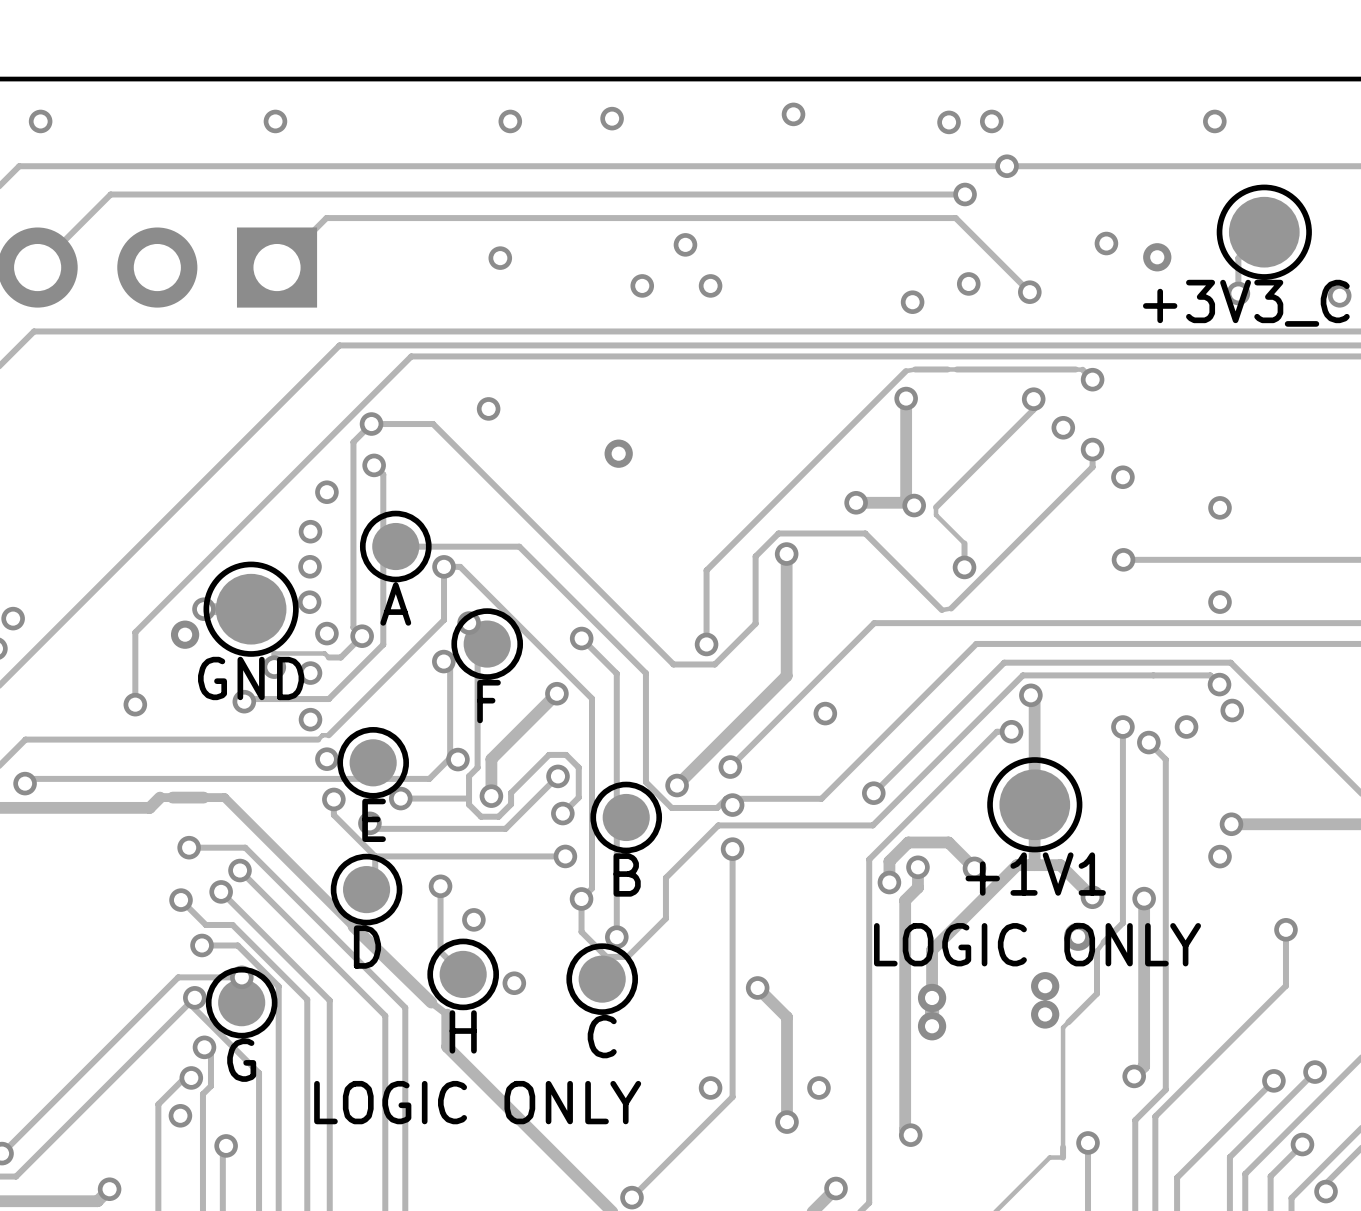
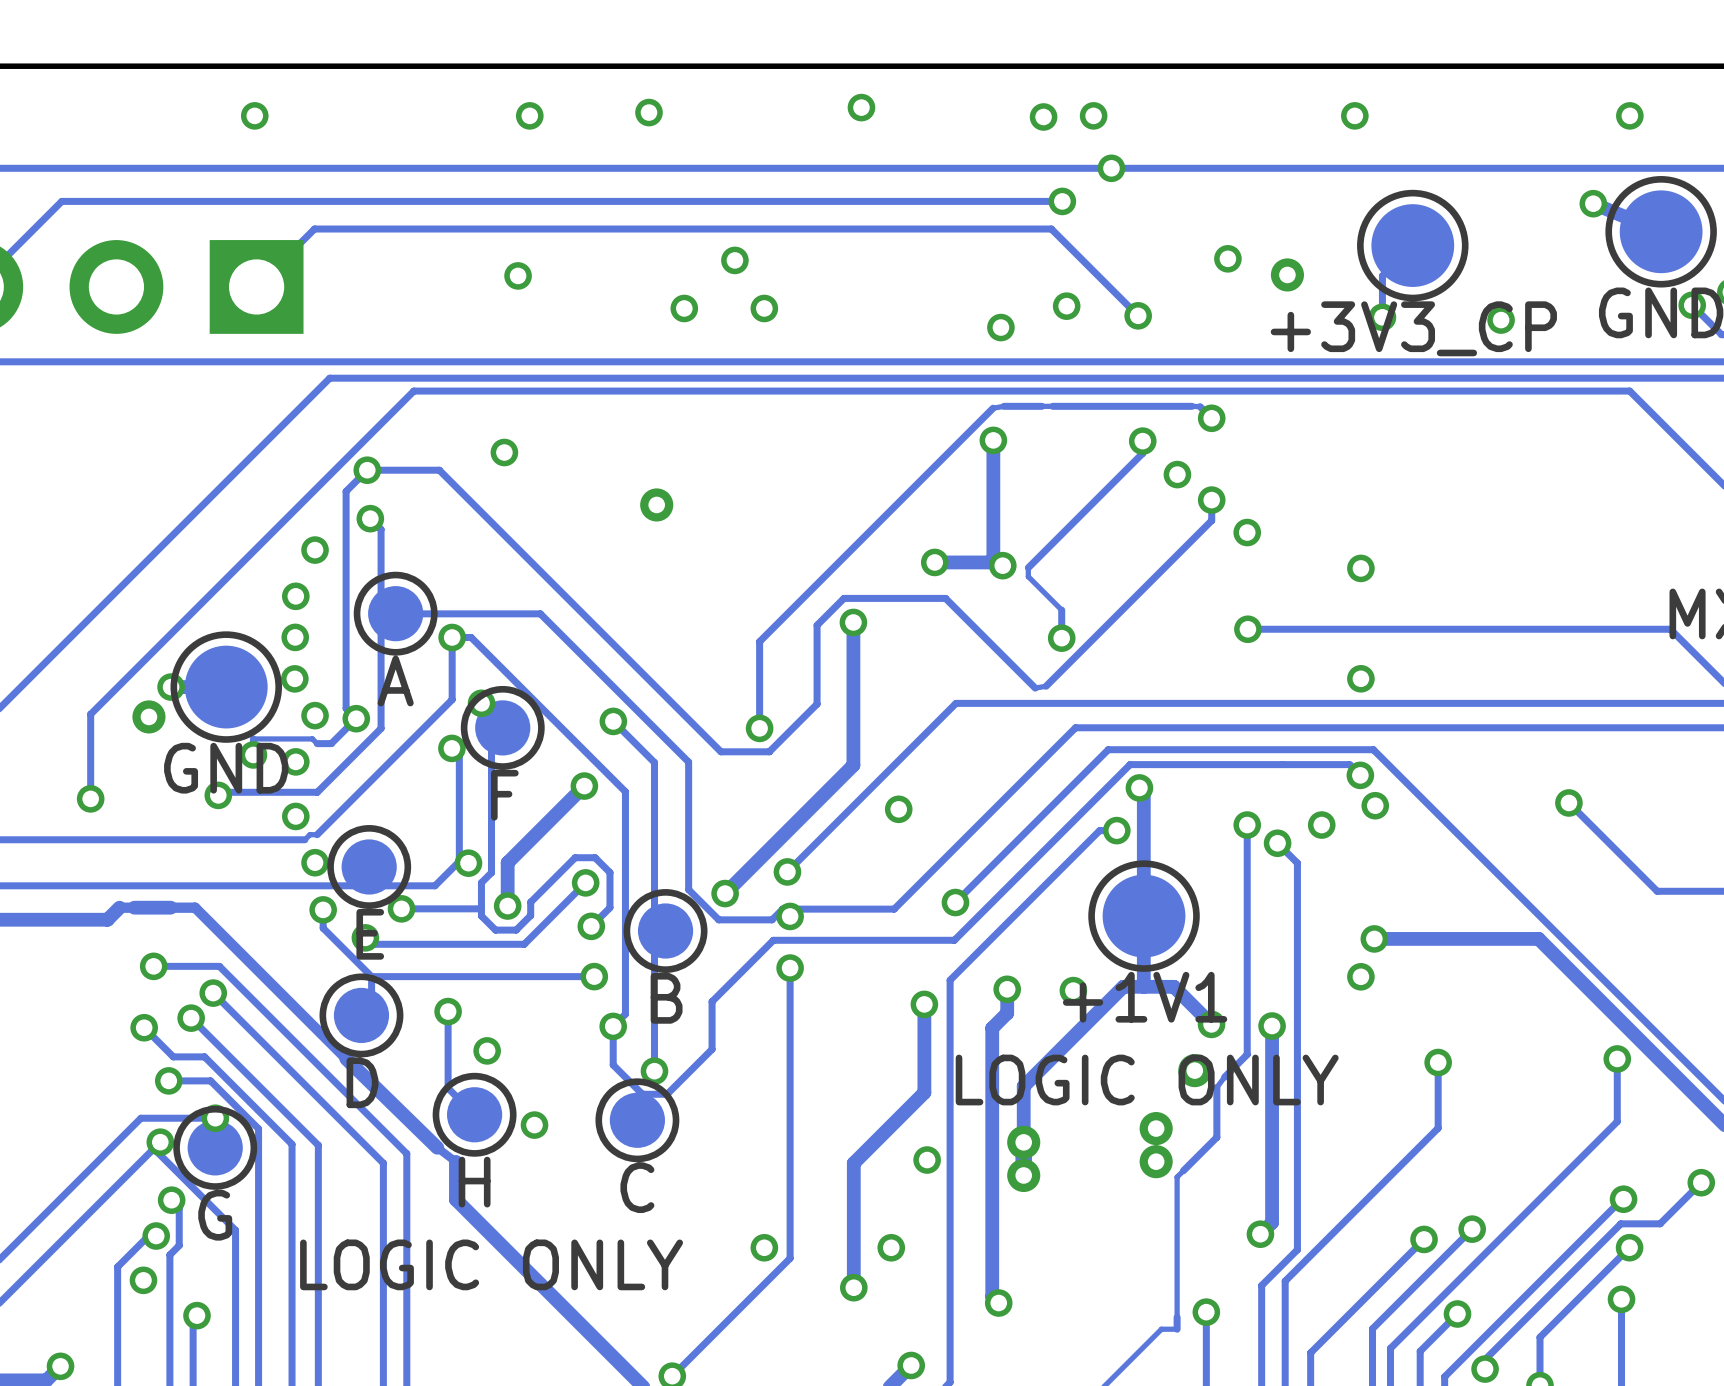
track: (974, 868) (948, 842) (908, 842) (889, 861) (889, 882) -> none
via position: (889, 882) -> (924, 1004)
track: (757, 987) (786, 1017) -> (924, 1004) (924, 1092) (853, 1164)
via: (757, 987) -> none
via: none -> (927, 1160)

